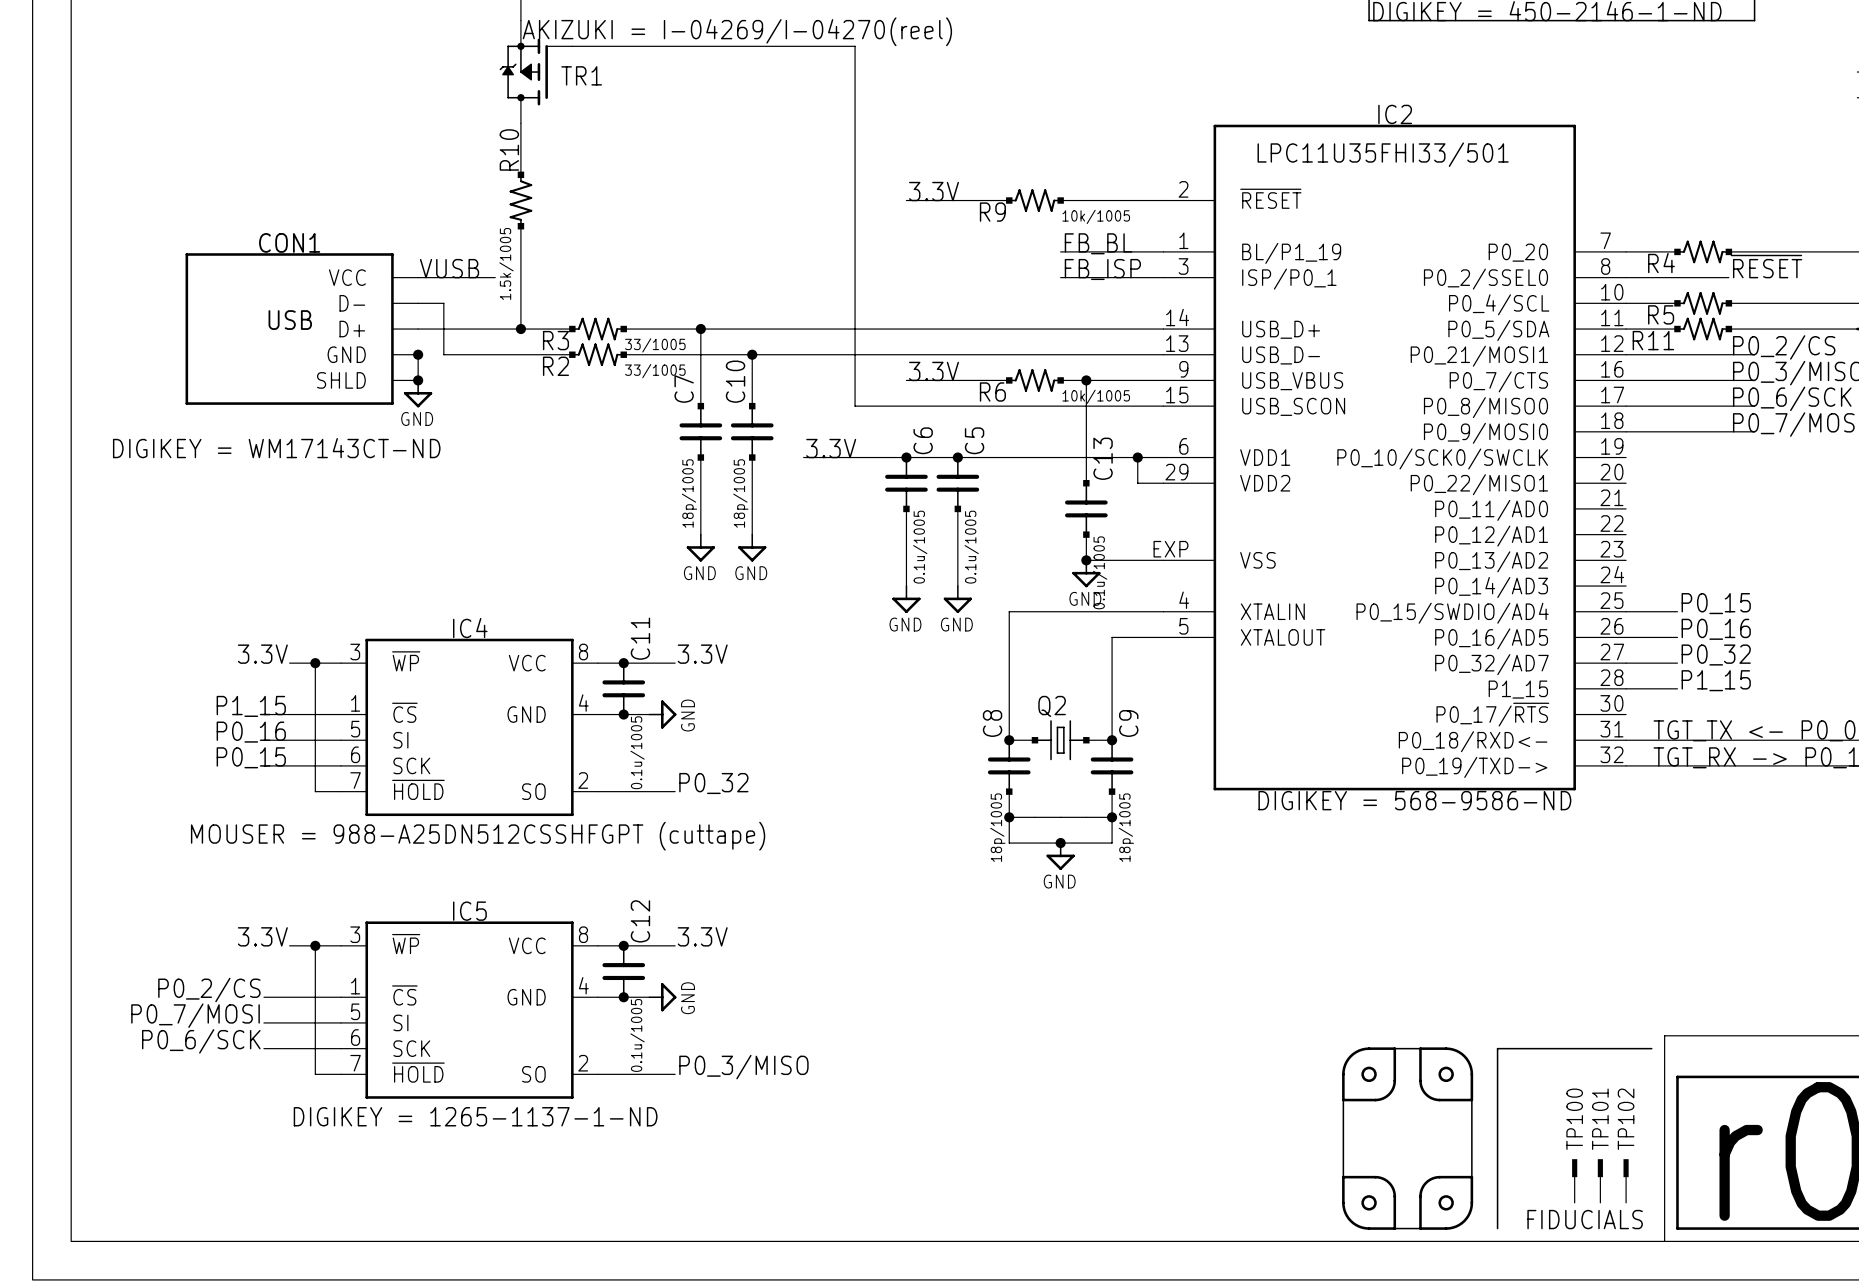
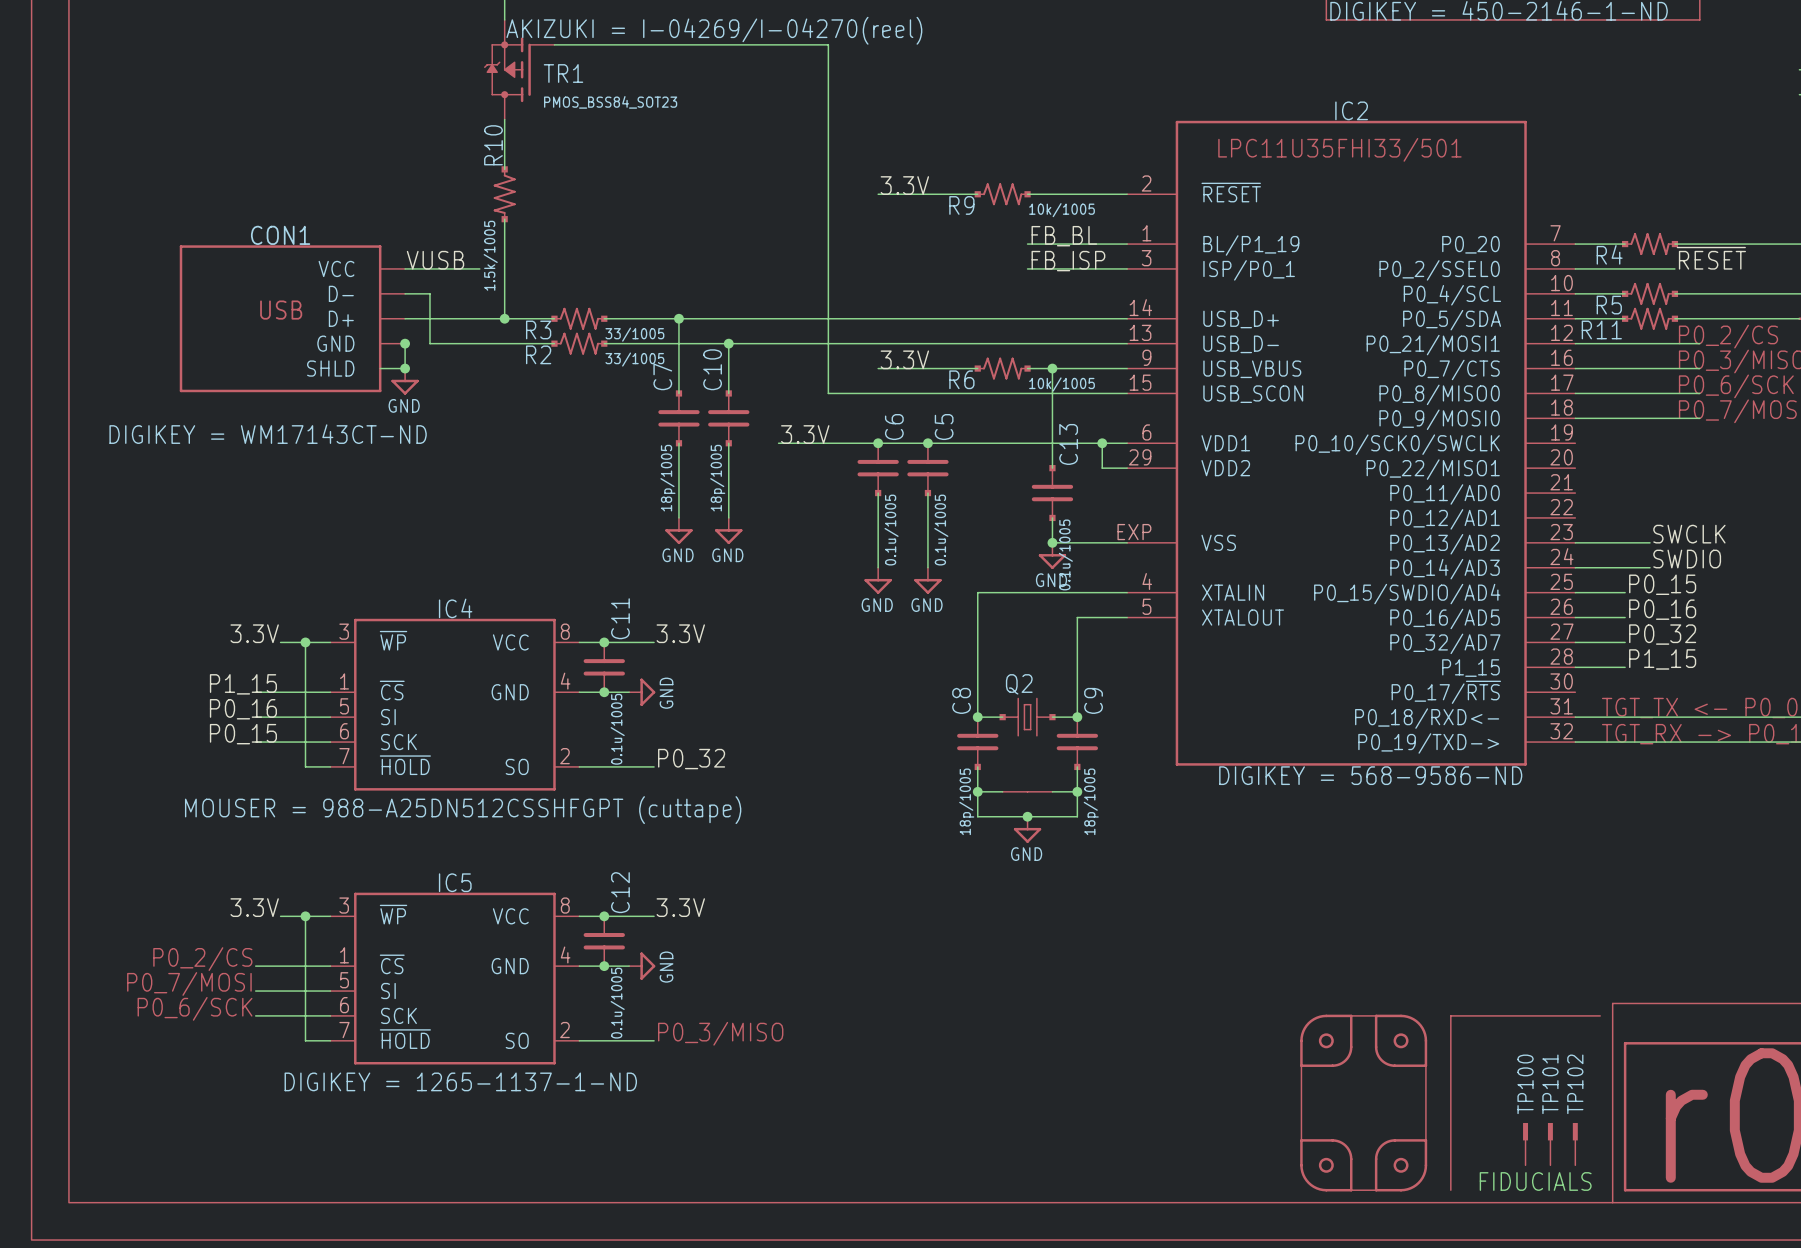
TR1 value: none -> PMOS_BSS84_SOT23 (610, 102)
label: none -> SWCLK (1689, 534)
wire: none -> (1575, 542) (1650, 542)
label: none -> SWDIO (1687, 559)
wire: none -> (1575, 567) (1650, 567)

